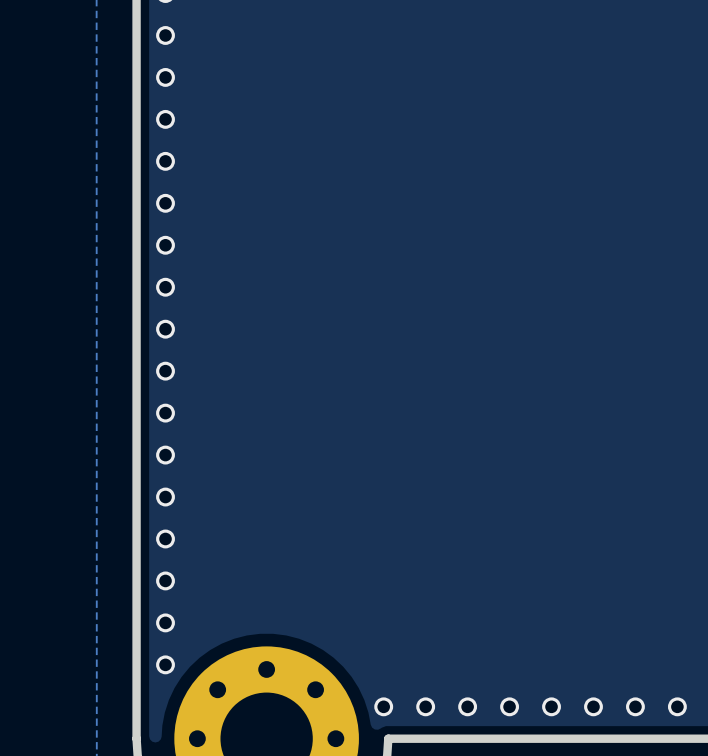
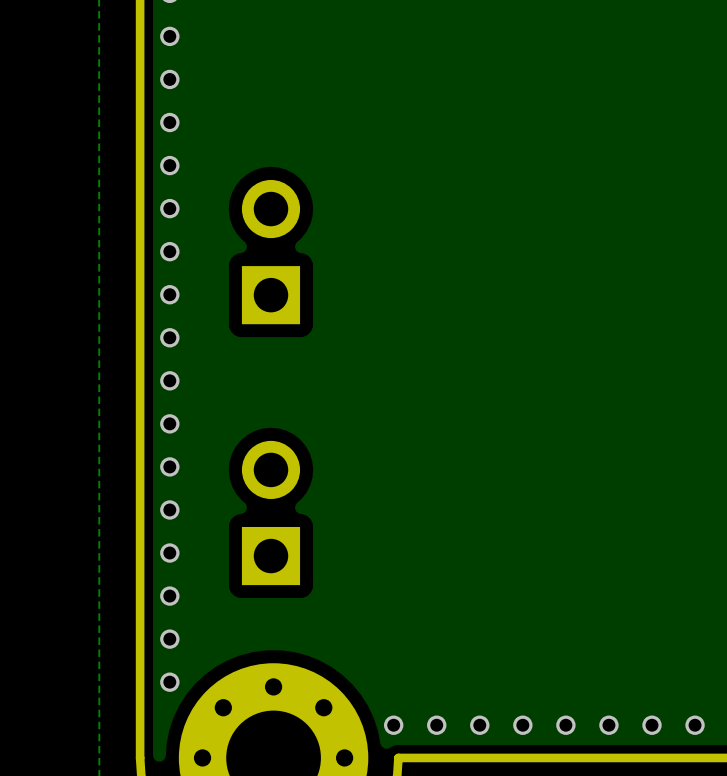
part: none -> (270, 252)
part: none -> (270, 512)

